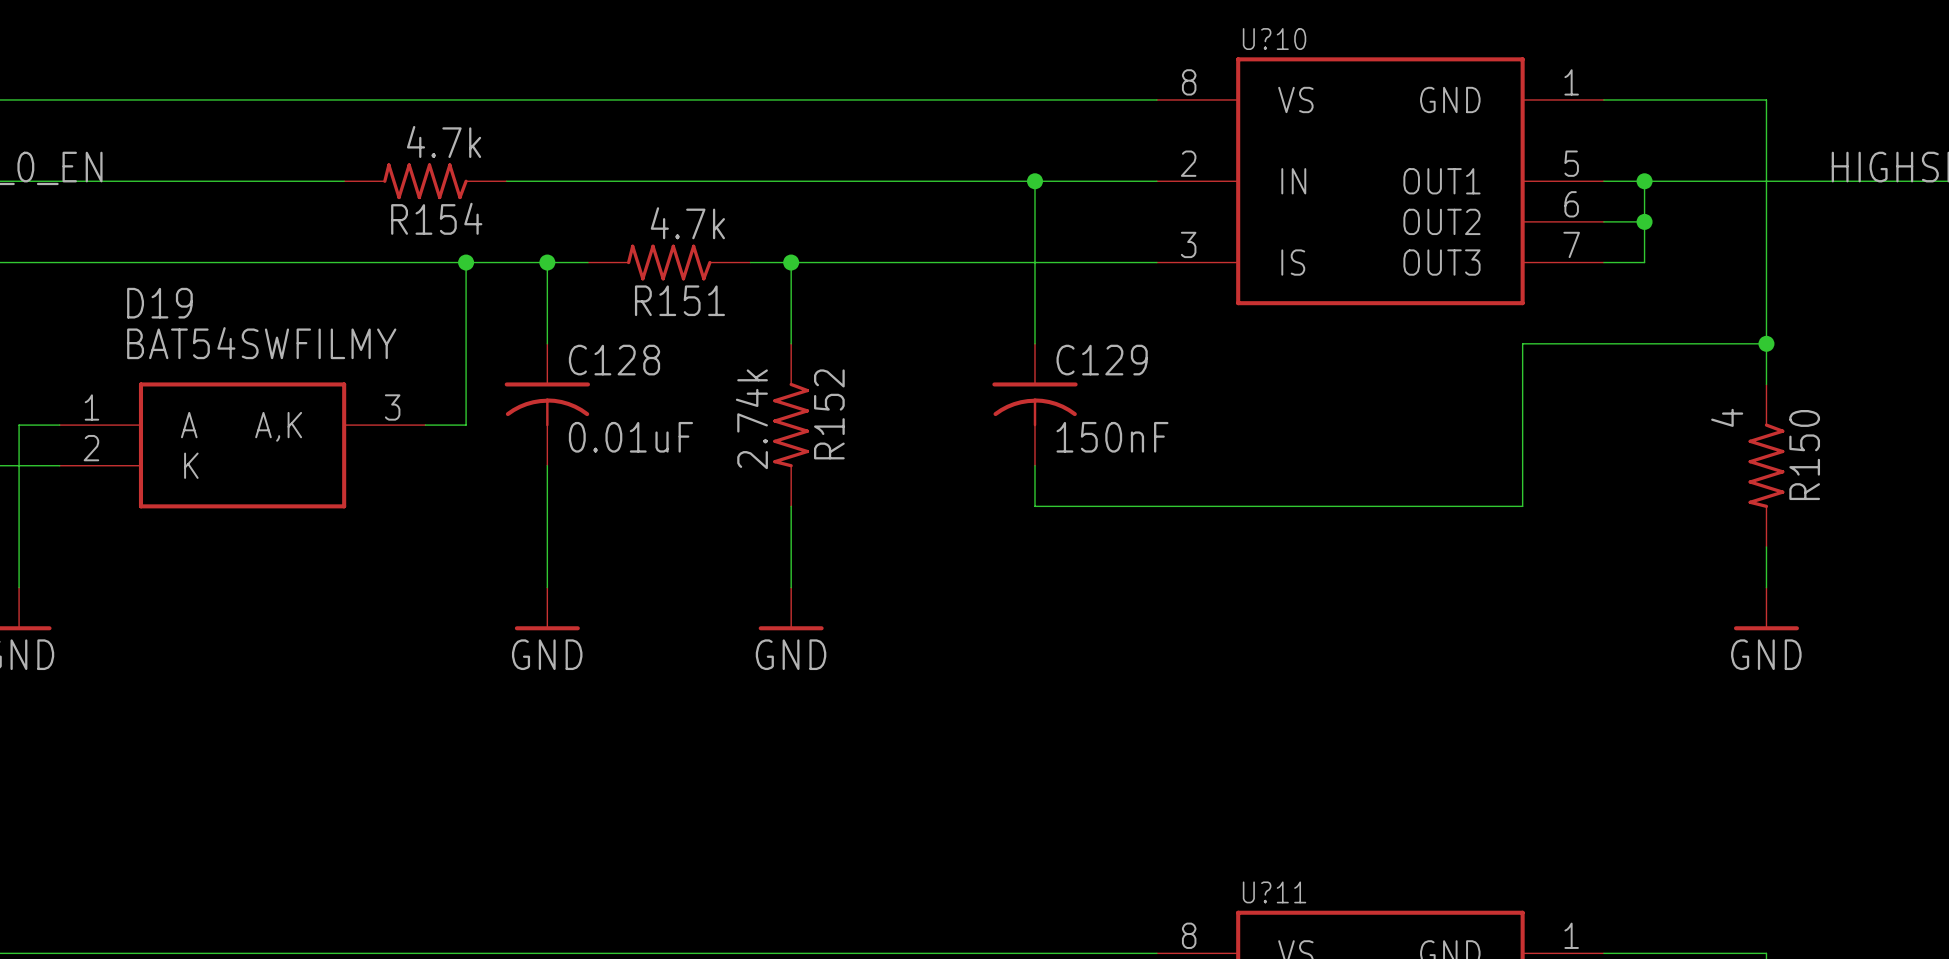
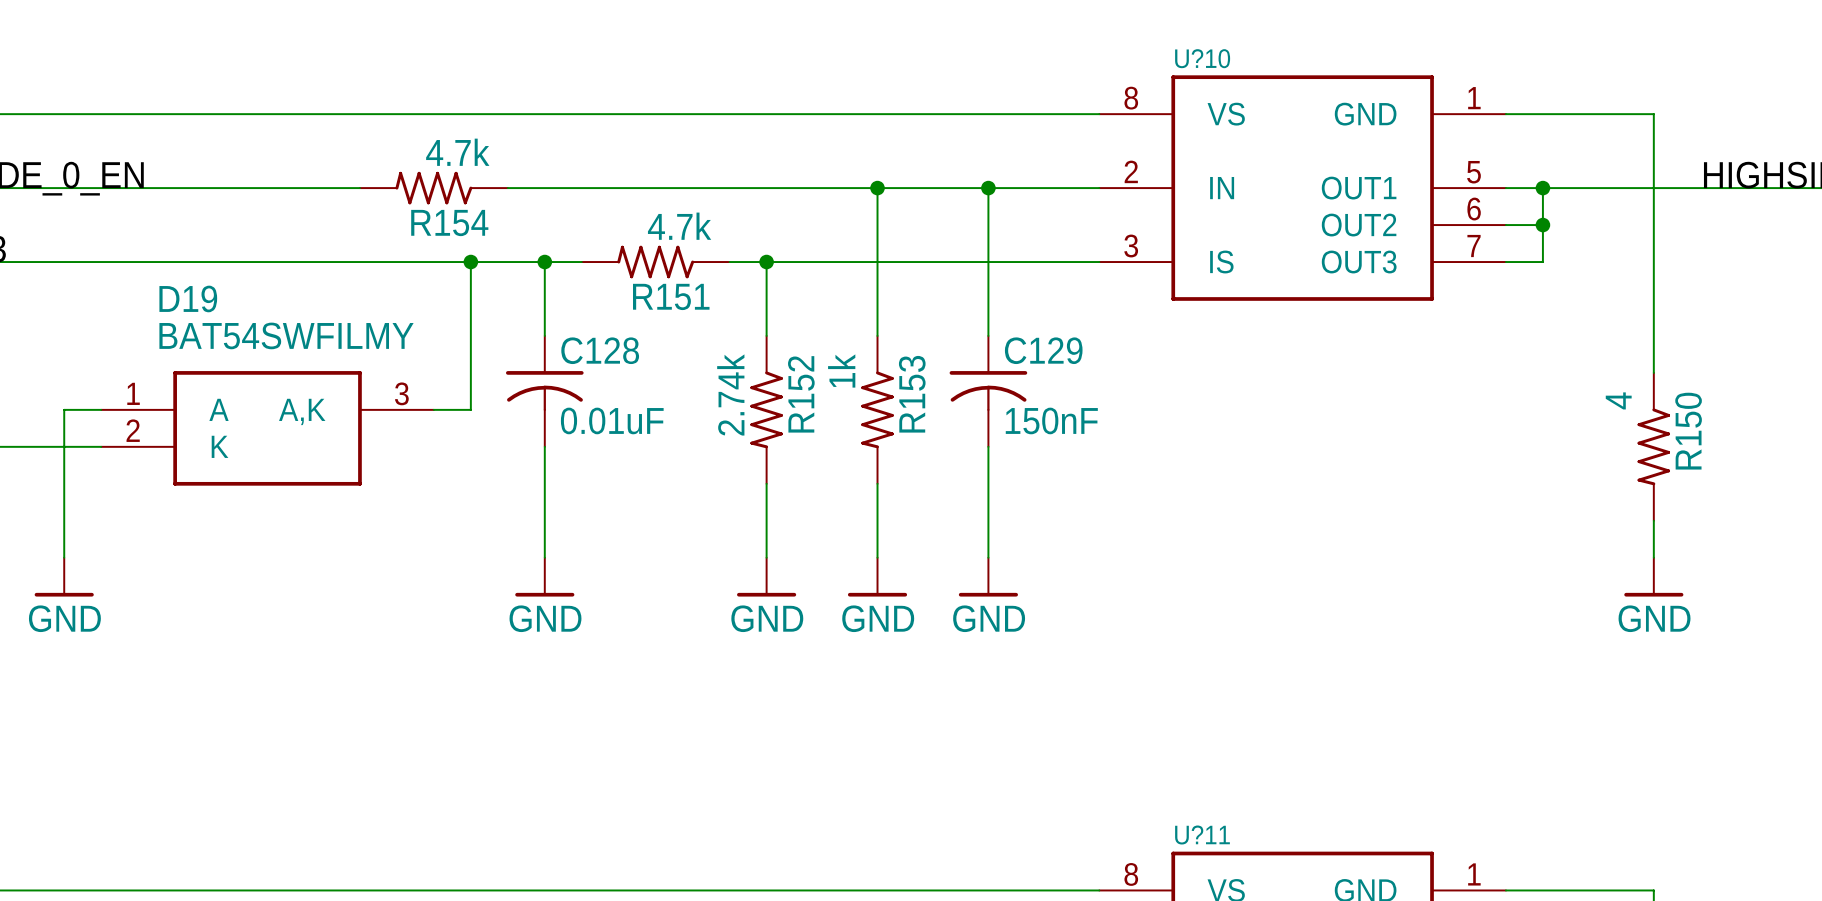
wire: none -> (877, 188) (877, 335)
junction: none -> (877, 188)
wire: (1766, 343) (1522, 343) (1522, 506) (1035, 506) -> (988, 557) (988, 483)
junction: (1766, 343) -> none
R153: none -> 1k (877, 409)
wire: none -> (877, 483) (877, 557)
power symbol: none -> GND (877, 577)
power symbol: none -> GND (988, 577)

